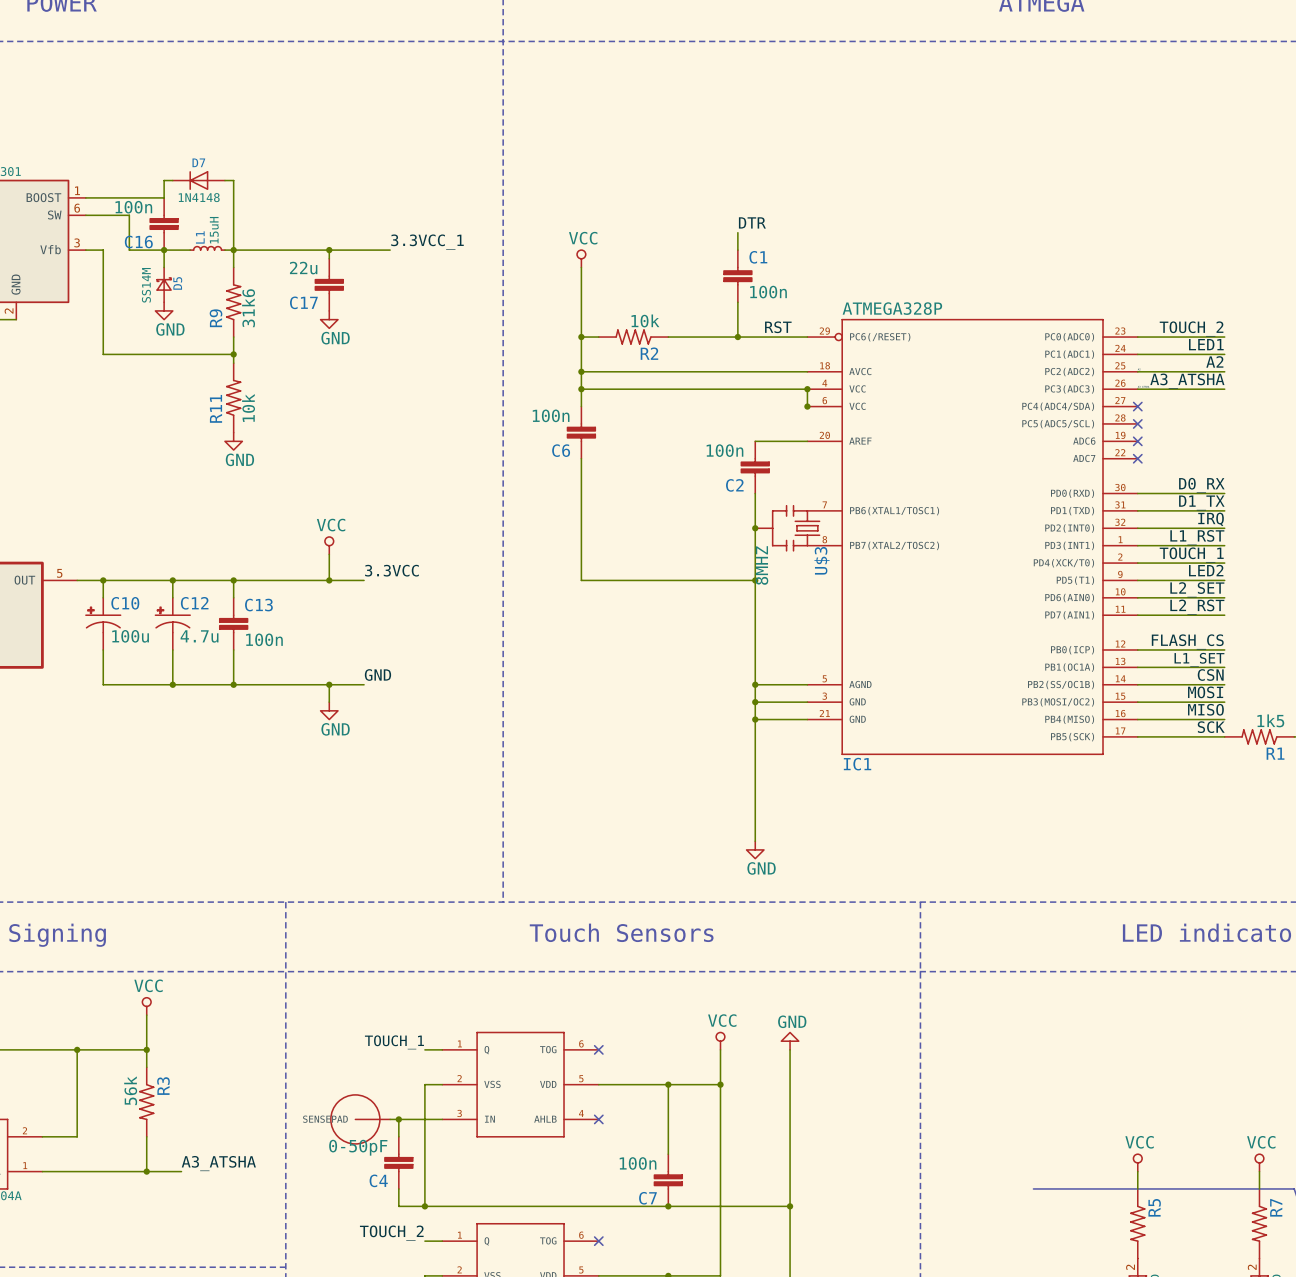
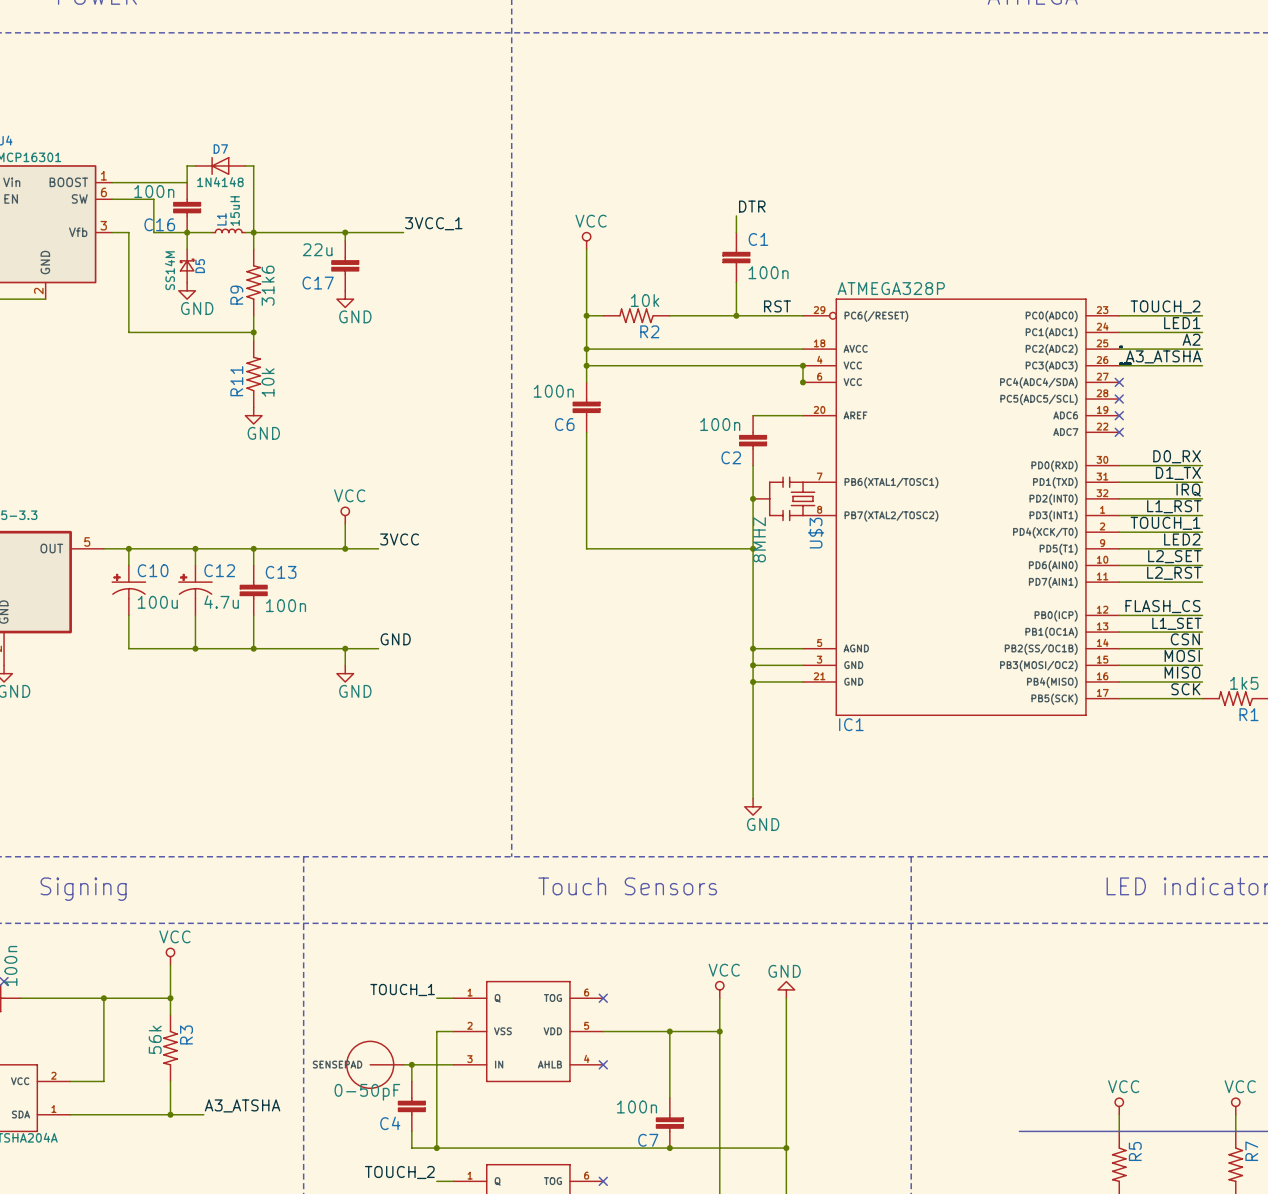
label: 3.3VCC_1 (427, 242) -> 3VCC_1 (433, 223)
label: 3.3VCC (391, 570) -> 3VCC (399, 539)

